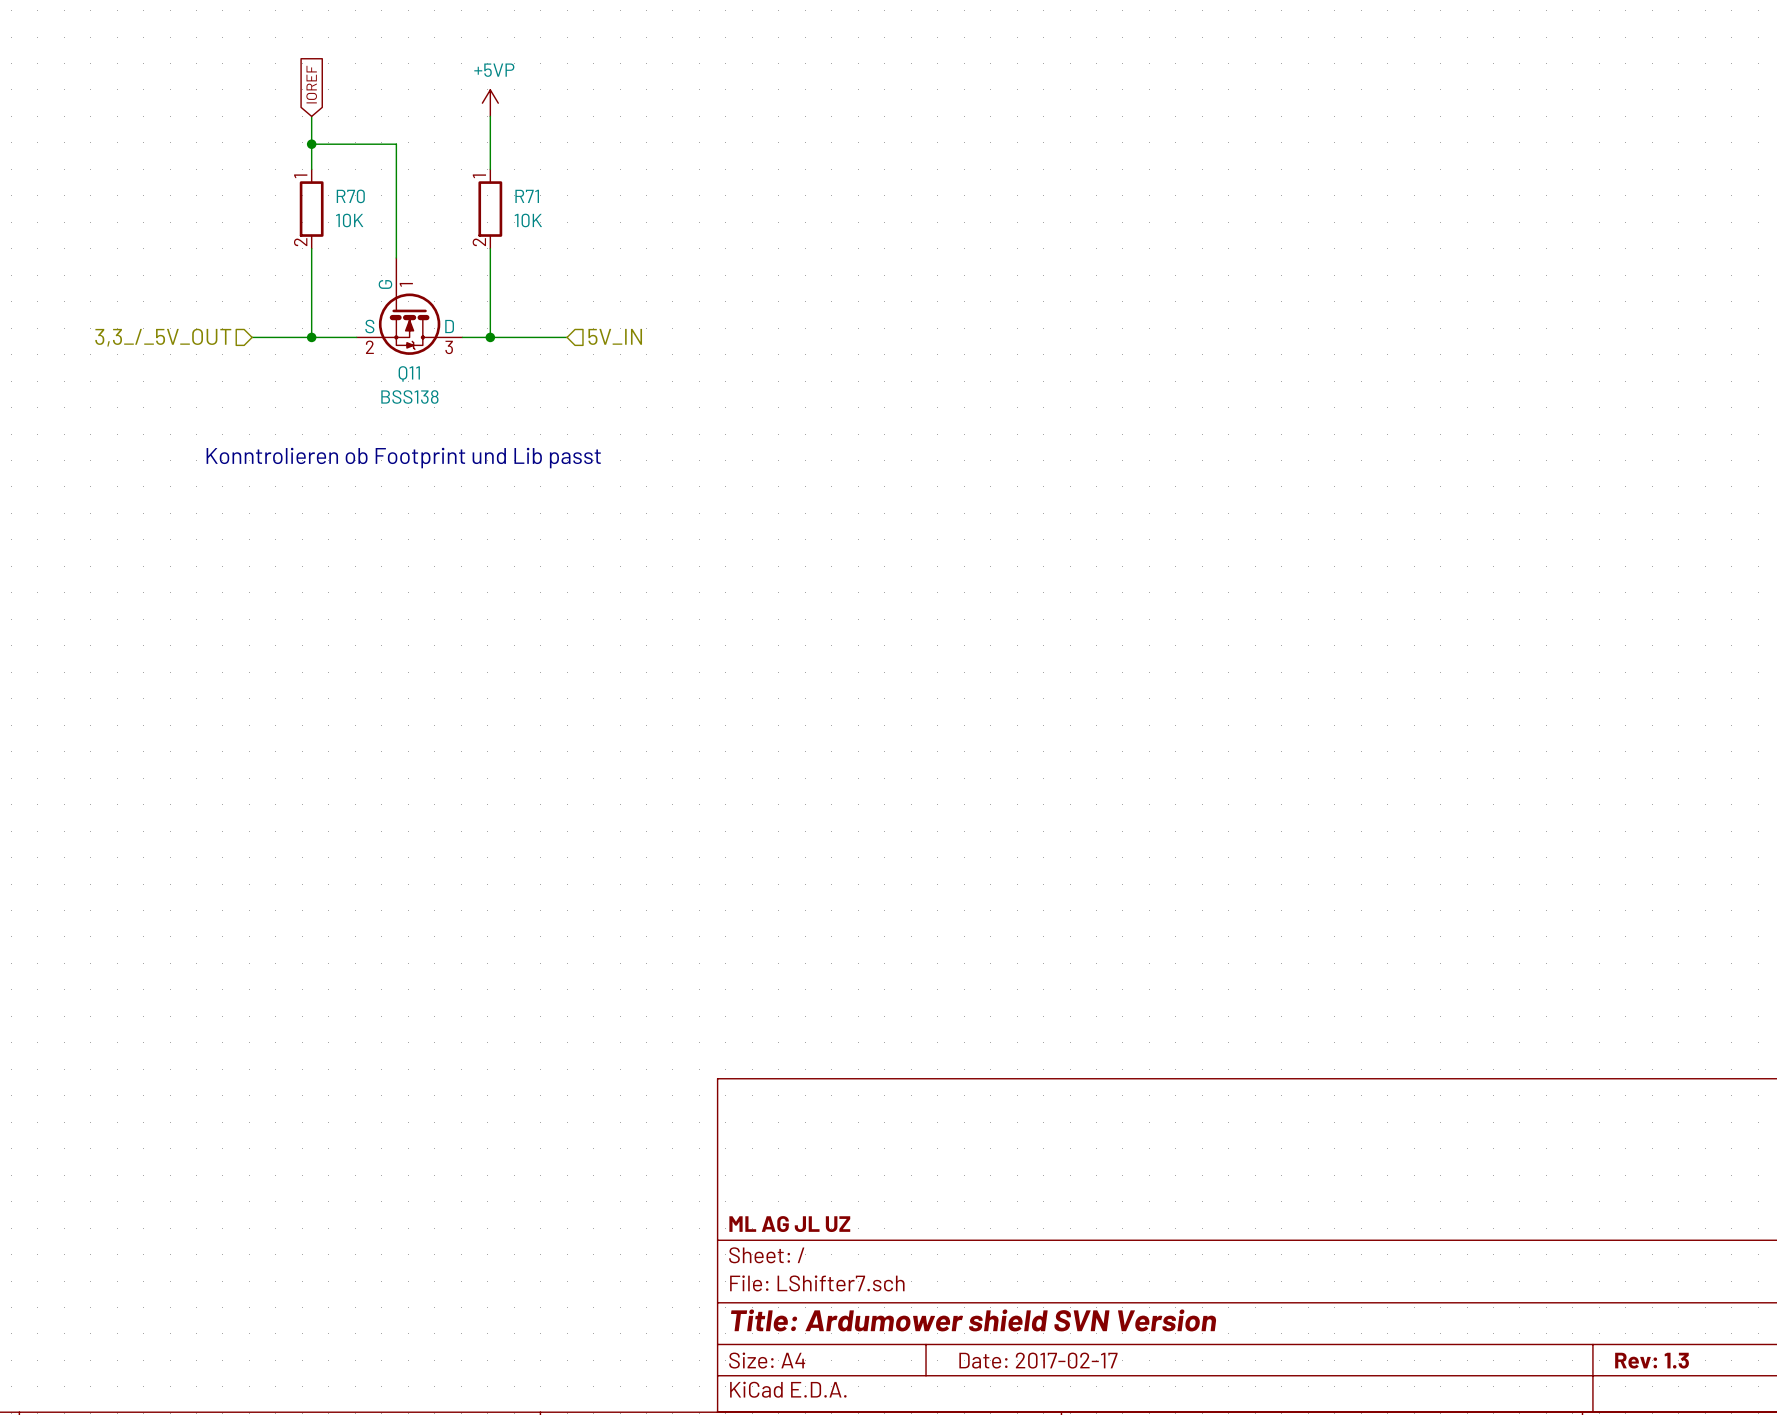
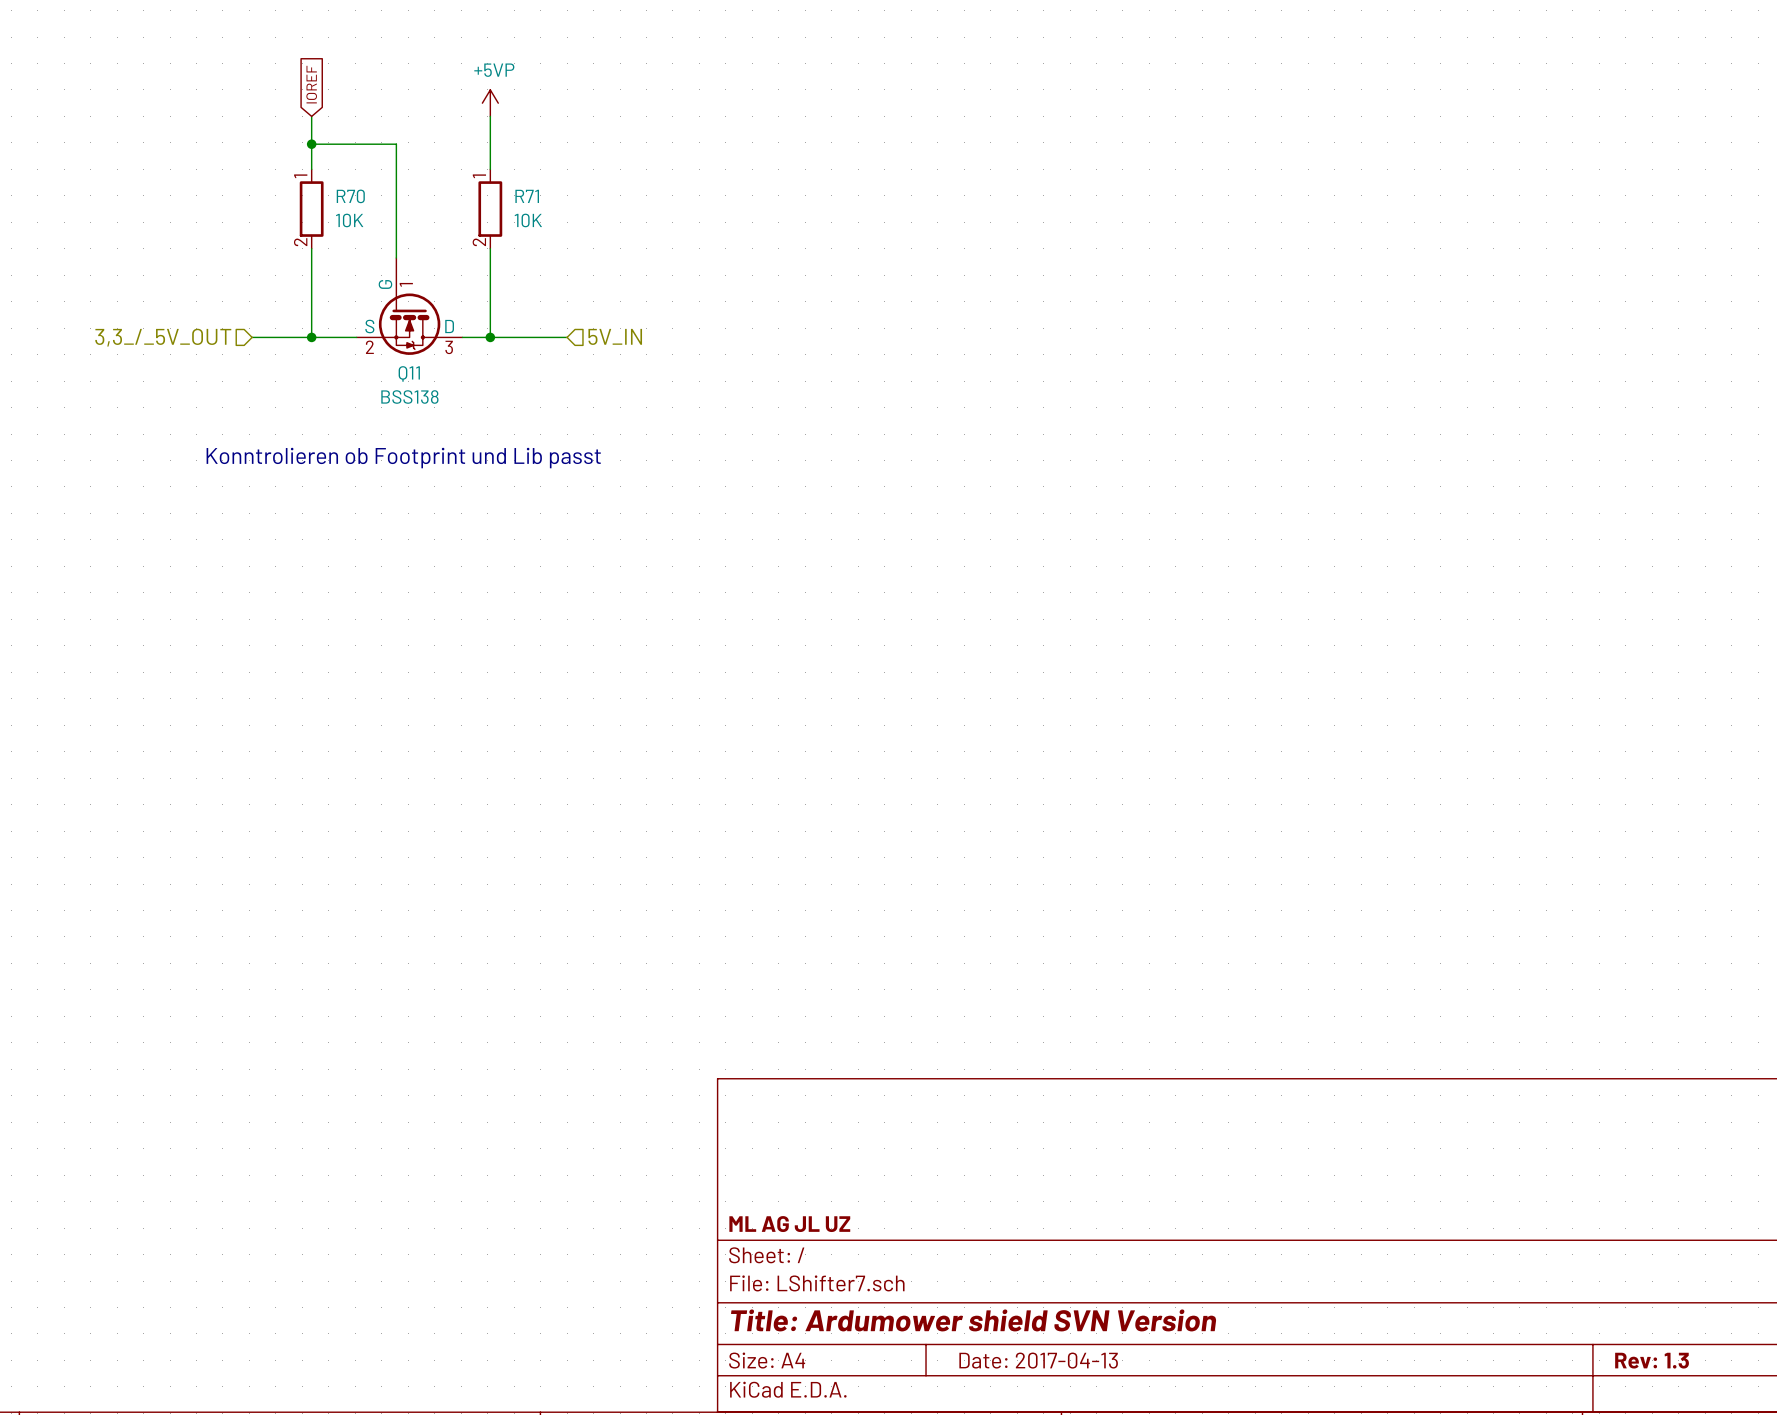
title block: Date: 2017-02-17 (1038, 1360) -> Date: 2017-04-13 (1038, 1360)

